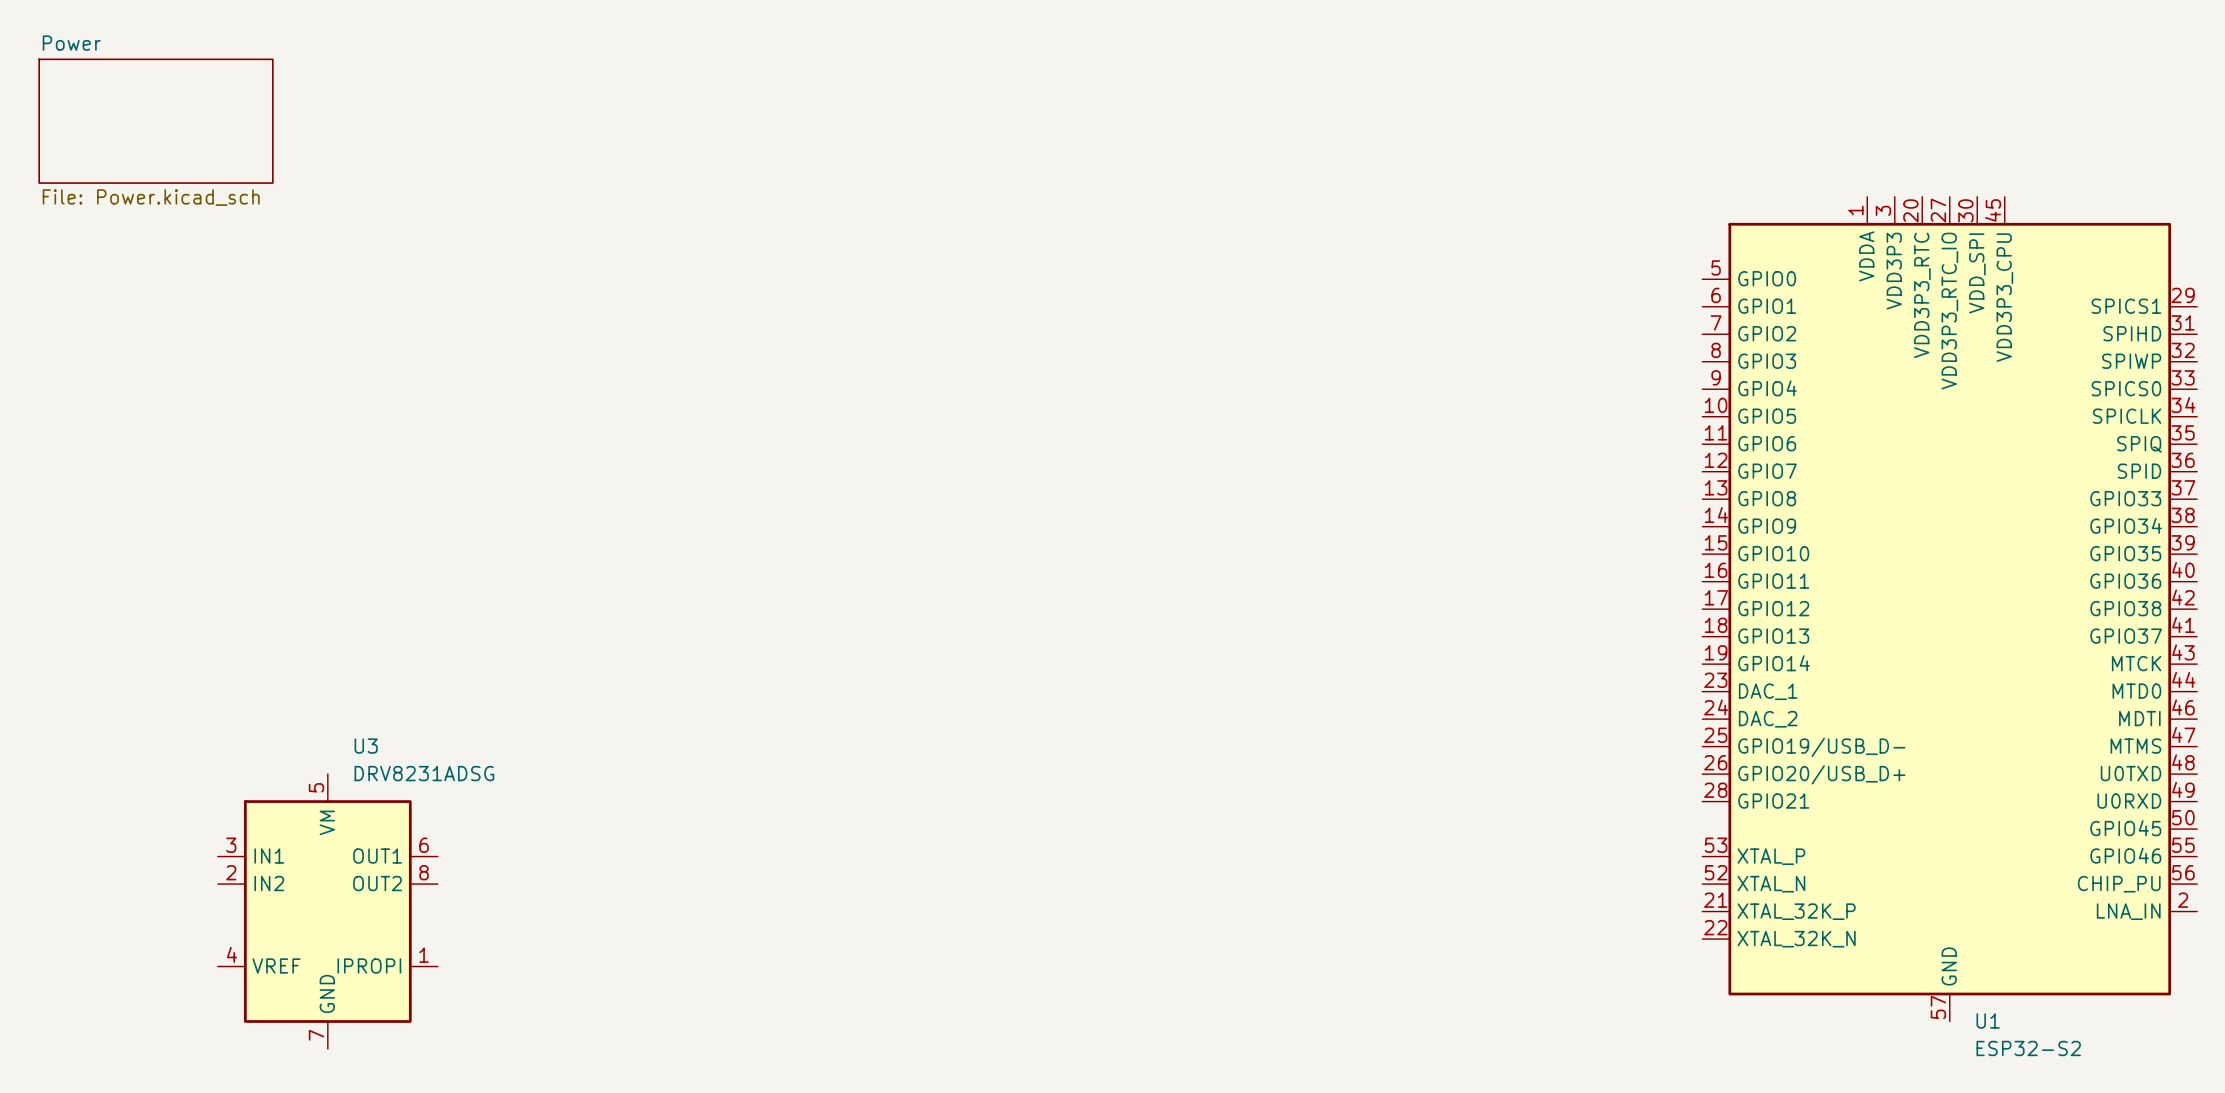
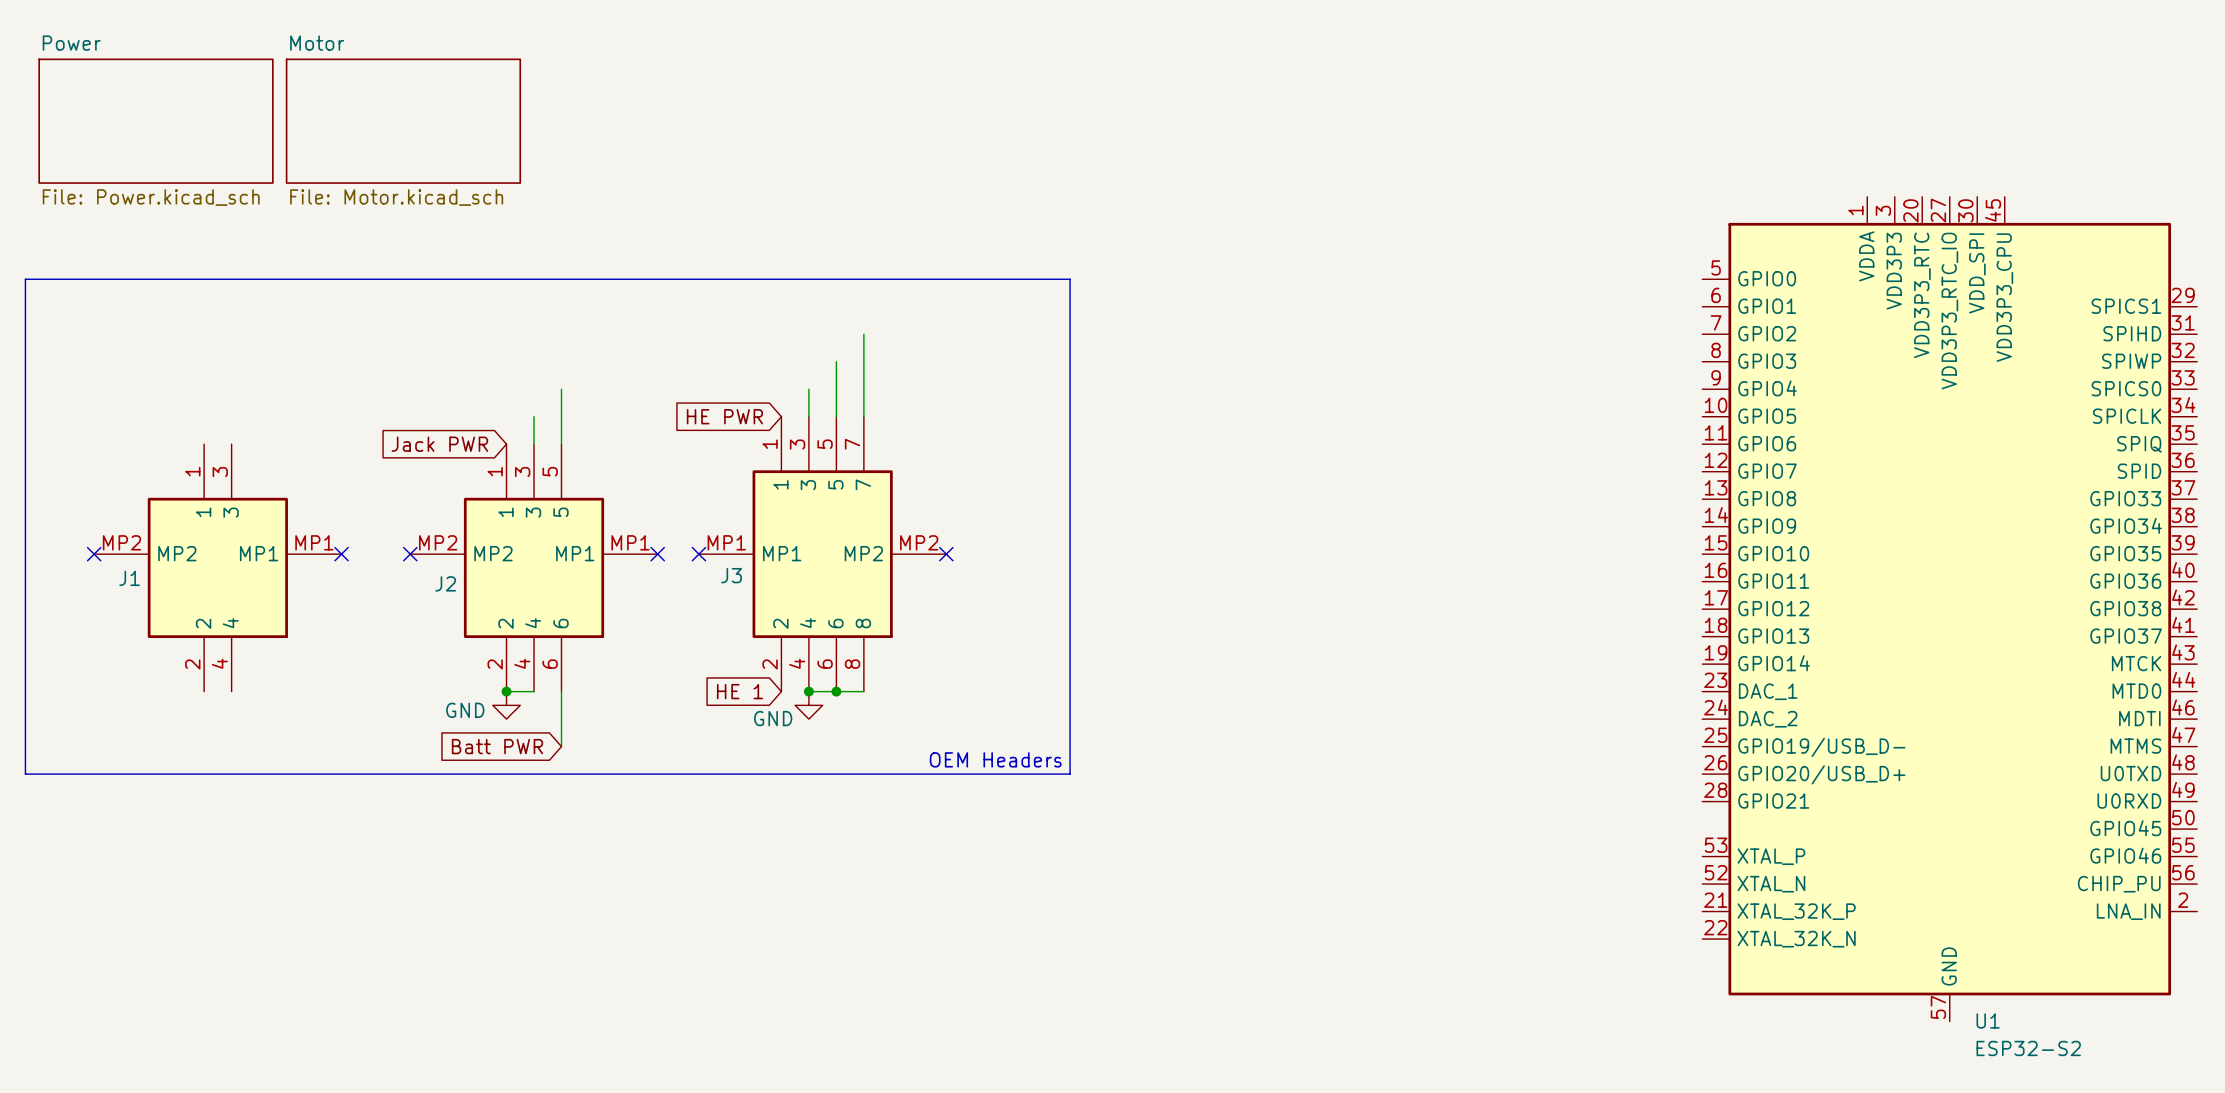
sheet Motor: none -> File: Motor.kicad_sch (403, 121)
line: none -> (25, 279) (1070, 279) (1070, 774) (25, 774) (25, 279)
wire: none -> (863, 334) (863, 416)
wire: none -> (836, 361) (836, 416)
wire: none -> (561, 389) (561, 444)
wire: none -> (808, 389) (808, 416)
wire: none -> (534, 416) (534, 444)
global label: none -> HE PWR (724, 416)
global label: none -> Jack PWR (439, 444)
no-connect mark: none -> (94, 554)
no-connect mark: none -> (341, 554)
no-connect mark: none -> (410, 554)
no-connect mark: none -> (657, 554)
no-connect mark: none -> (698, 554)
J3: none -> (822, 554)
no-connect mark: none -> (946, 554)
J1: none -> (217, 567)
J2: none -> (534, 567)
wire: none -> (506, 691) (534, 691)
junction: none -> (506, 691)
wire: none -> (561, 691) (561, 746)
global label: none -> HE 1 (739, 691)
wire: none -> (808, 691) (863, 691)
junction: none -> (808, 691)
junction: none -> (836, 691)
power symbol: none -> GND (506, 705)
power symbol: none -> GND (808, 705)
global label: none -> Batt PWR (497, 746)
text: none -> OEM Headers (995, 759)
U3: DRV8231ADSG (327, 911) -> none

